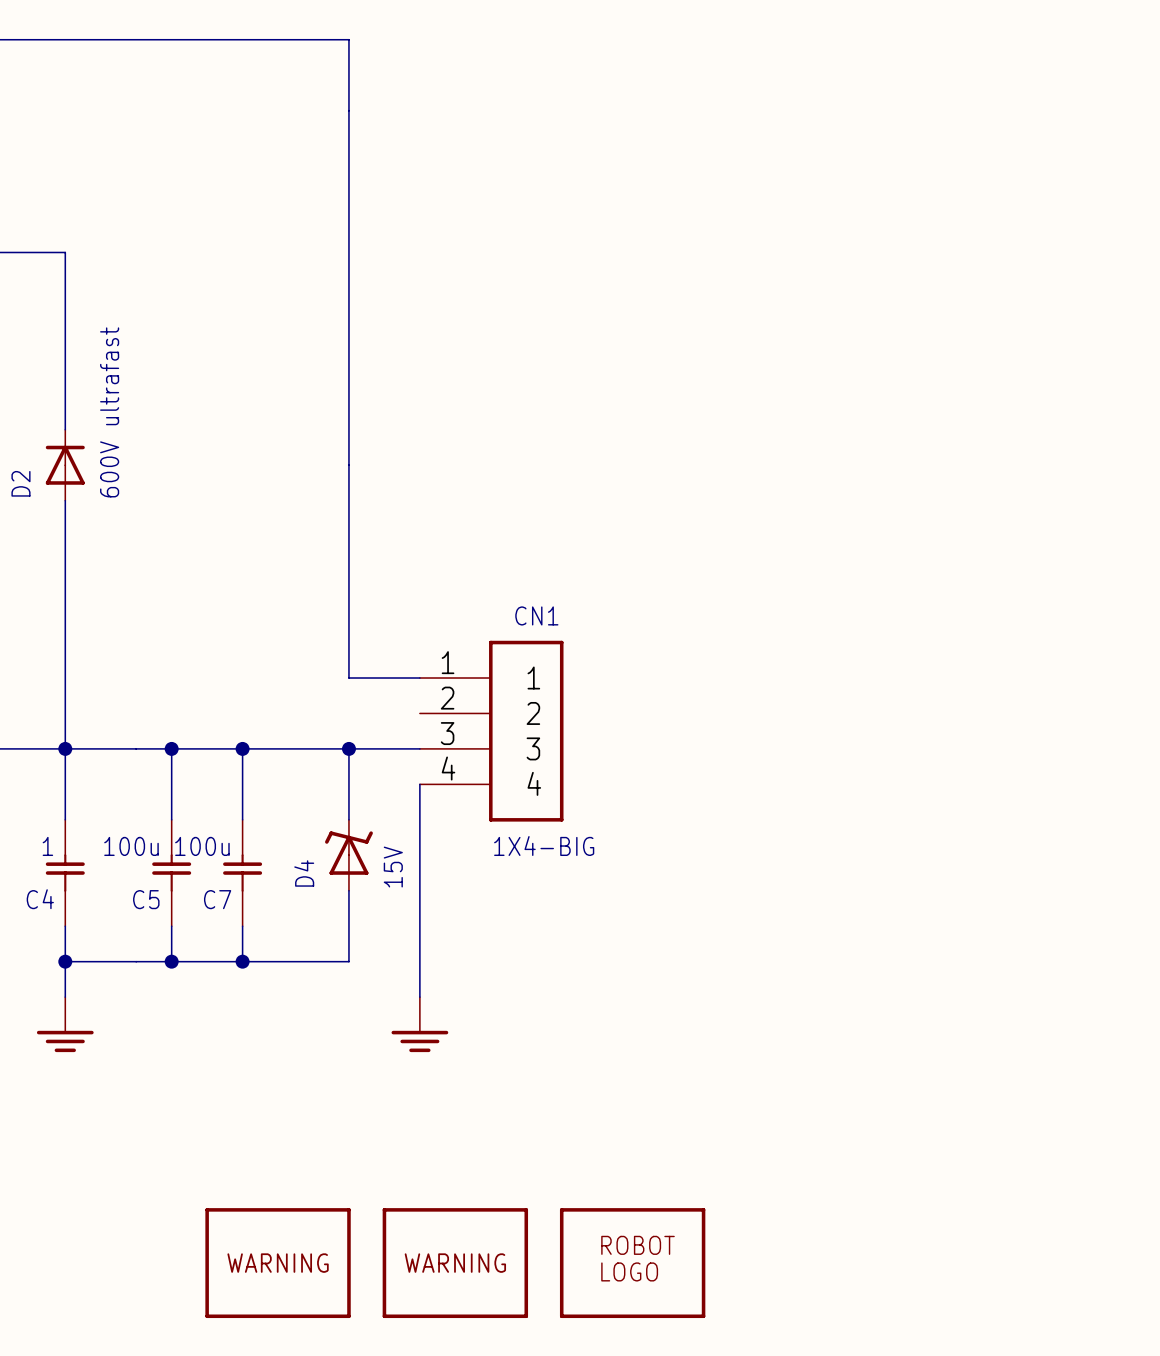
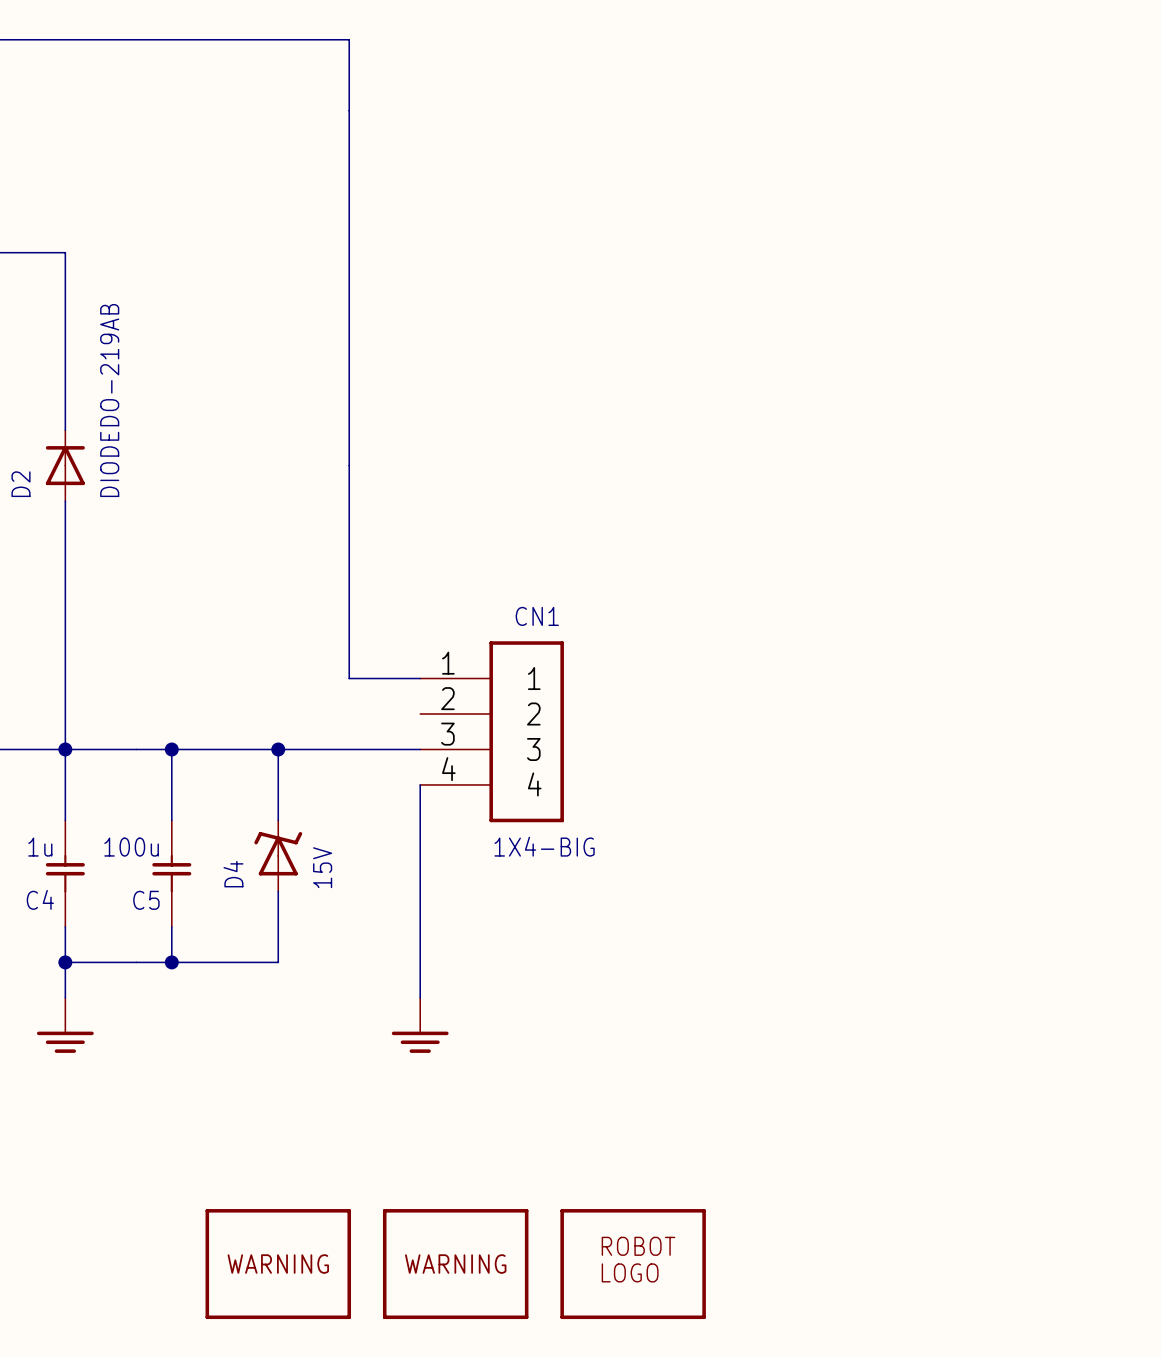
D2 value: 600V ultrafast (109, 412) -> DIODEDO-219AB (109, 400)
wire: (242, 748) (242, 819) -> (278, 749) (278, 820)
junction: (242, 748) -> none
junction: none -> (278, 749)
wire: (348, 748) (348, 819) -> none
junction: (348, 748) -> none
C4 value: 1 (47, 846) -> 1u (40, 847)
D4 position: (348, 855) -> (278, 855)
C7: 100u (242, 873) -> none
wire: (348, 890) (348, 961) (278, 961) -> (278, 891) (278, 962)
wire: (242, 926) (242, 961) -> none
junction: (242, 961) -> none

